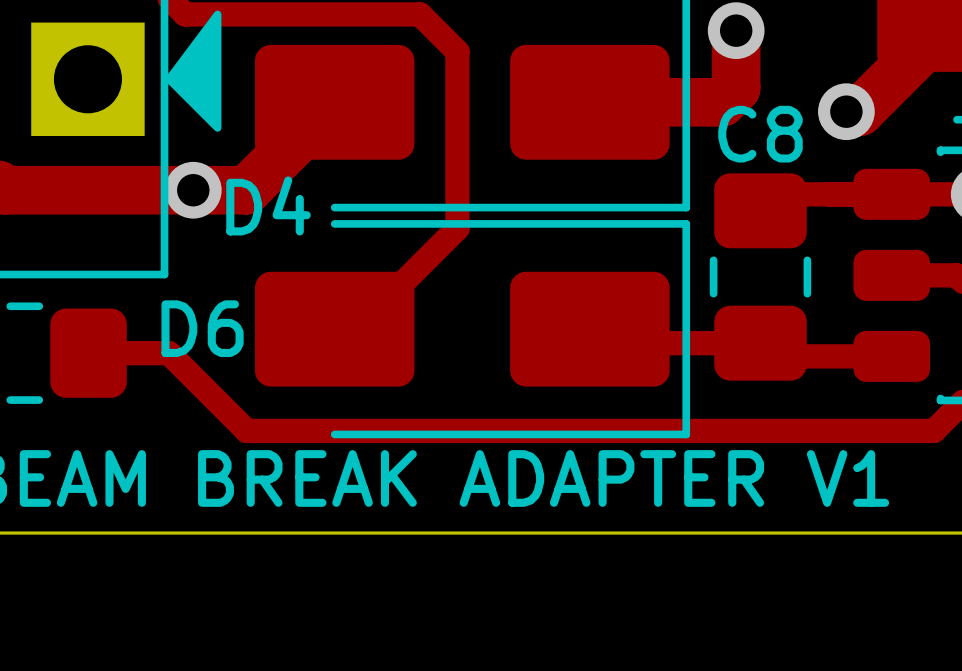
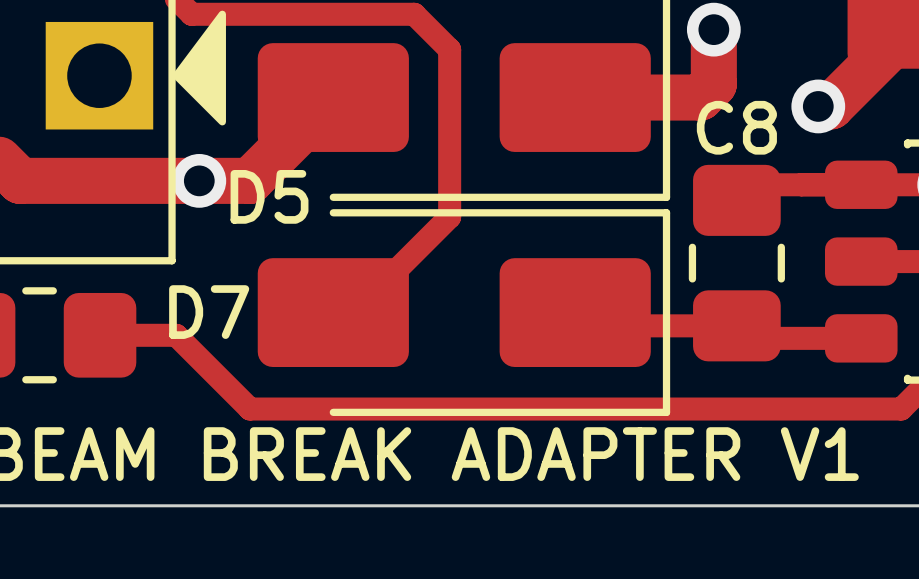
D4 name: D4 (268, 205) -> D5 (269, 196)
D6 name: D6 (202, 328) -> D7 (209, 312)

